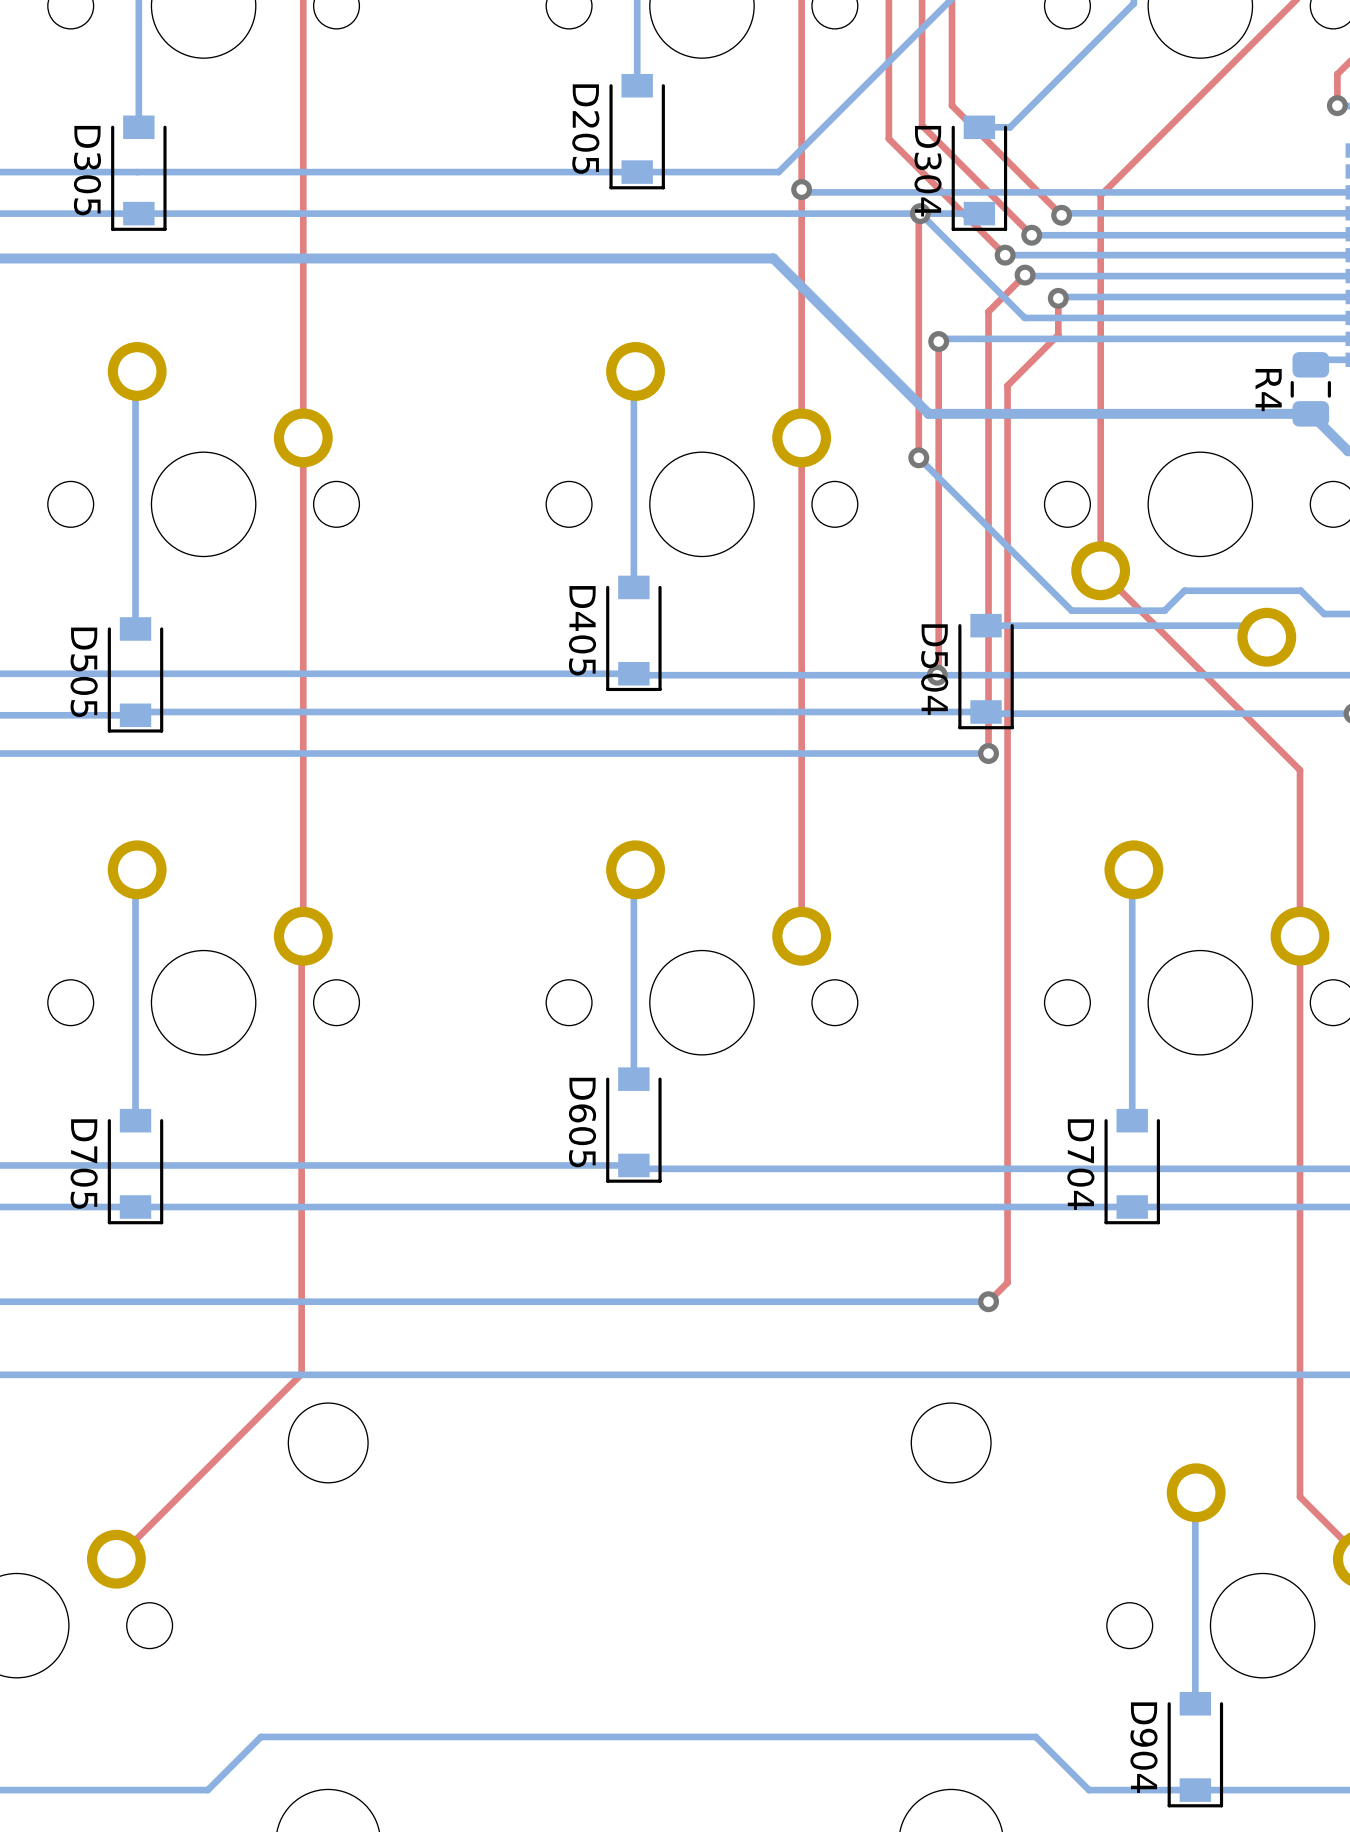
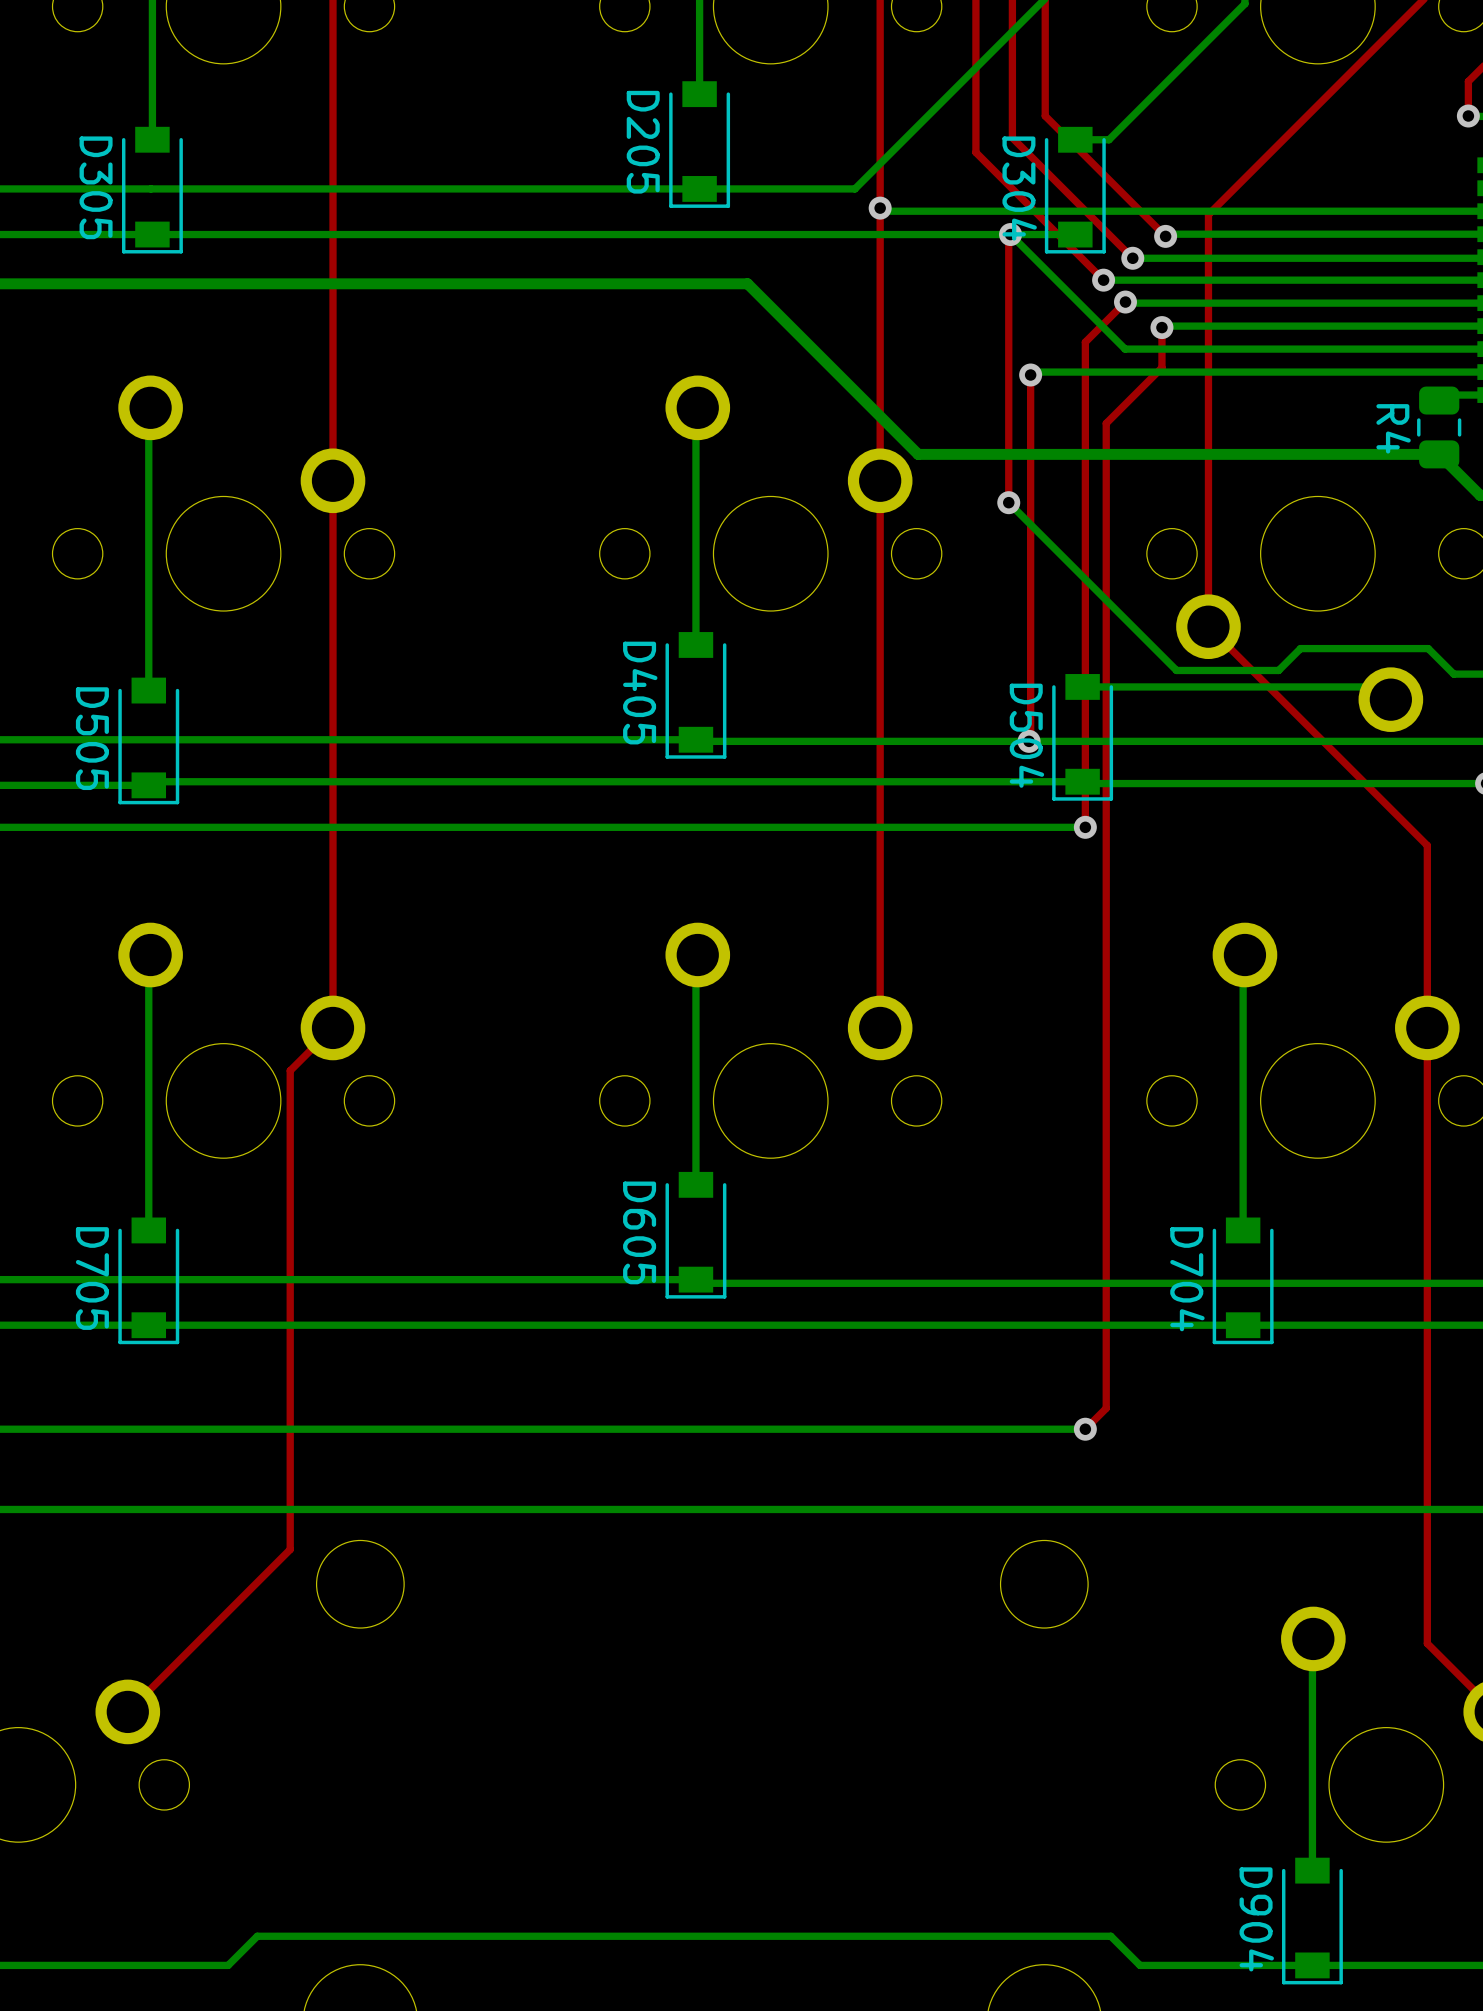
bottom track: (680, 258) (773, 258) (928, 413) -> (747, 283) (918, 454) (1019, 454)
top track: (301, 937) (301, 1373) (264, 1411) -> (331, 1029) (290, 1070) (290, 1549)
bottom track: (234, 1763) (260, 1736) (1035, 1736) (1089, 1790) -> (257, 1936) (1110, 1936) (1140, 1965) (1195, 1965)

